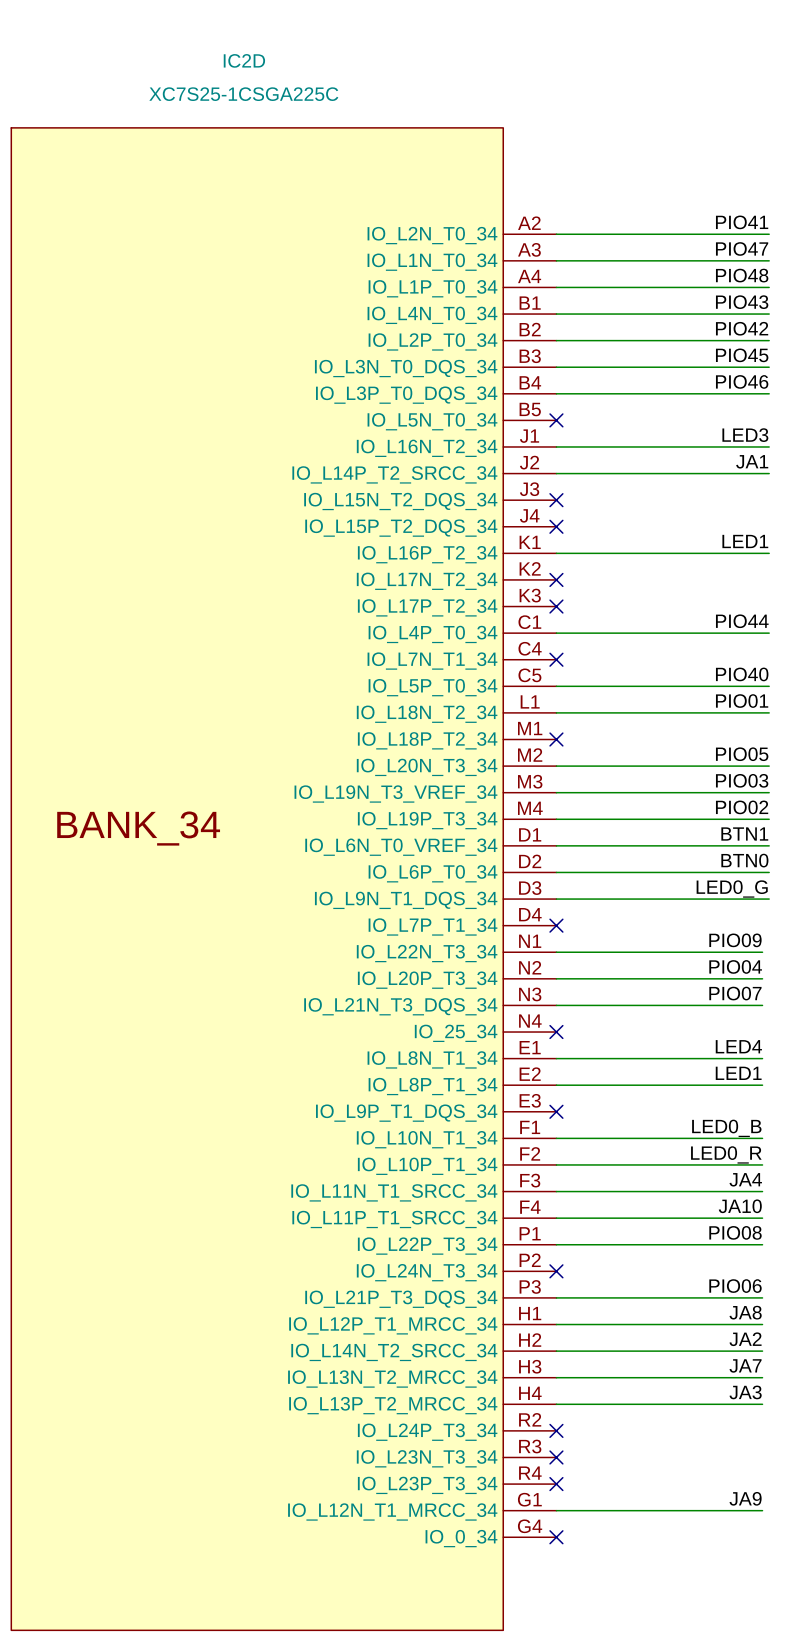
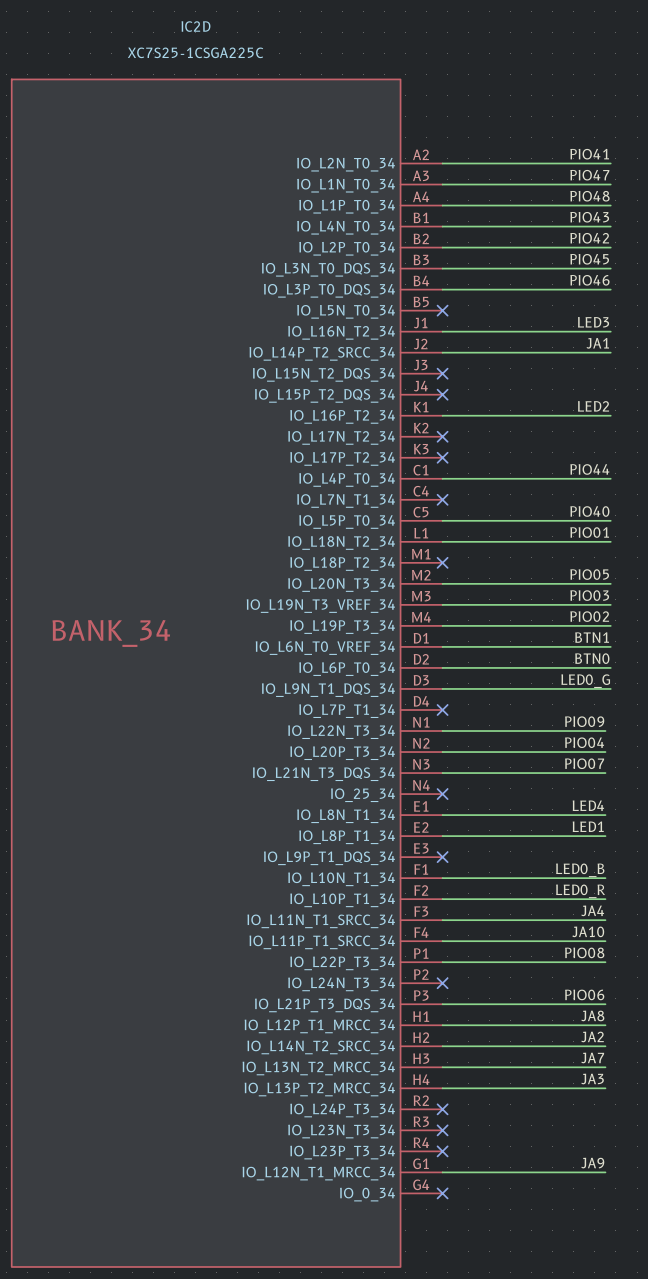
label: LED1 (745, 541) -> LED2 (593, 406)

